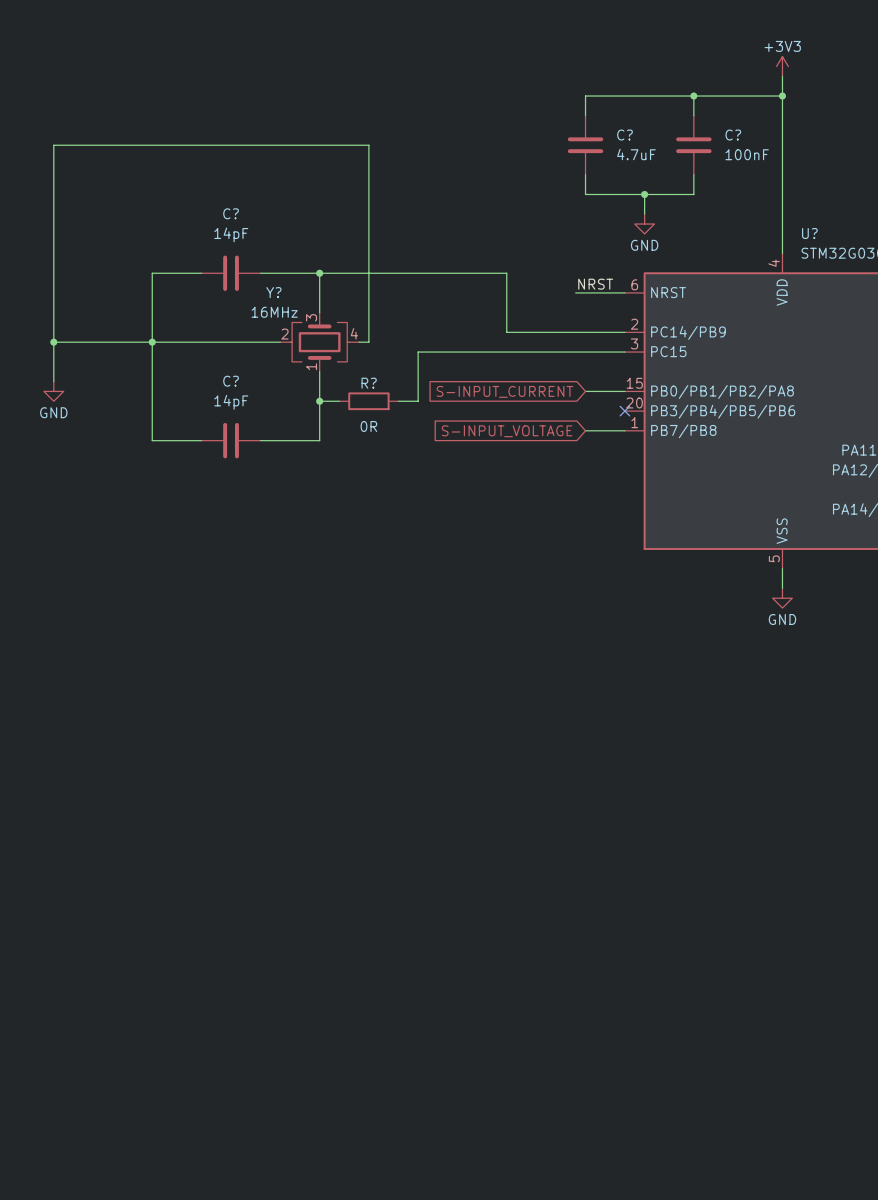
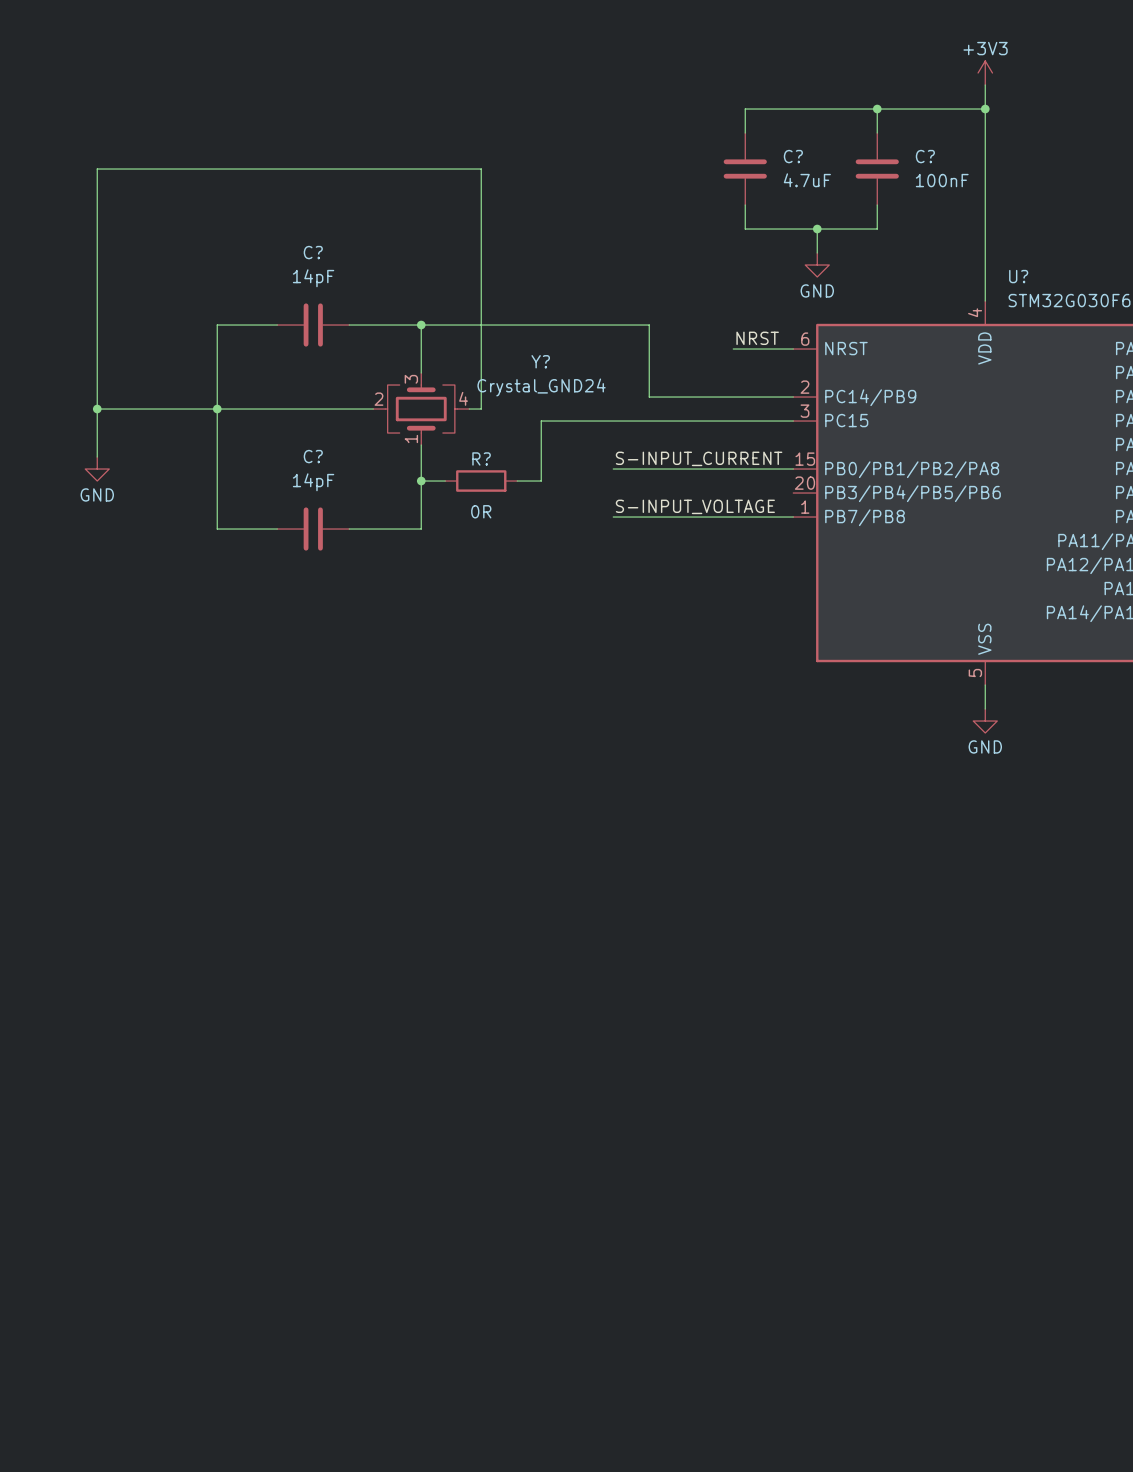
Y? name position: Y? (273, 292) -> Y? (540, 361)
Y? value: 16MHz (274, 312) -> Crystal_GND24 (541, 387)
label: none -> S-INPUT_CURRENT (699, 458)
wire: none -> (613, 469) (745, 469)
global label: S-INPUT_CURRENT (504, 391) -> none
no-connect mark: (624, 411) -> none
label: none -> S-INPUT_VOLTAGE (695, 506)
wire: none -> (613, 517) (745, 517)
global label: S-INPUT_VOLTAGE (507, 431) -> none

